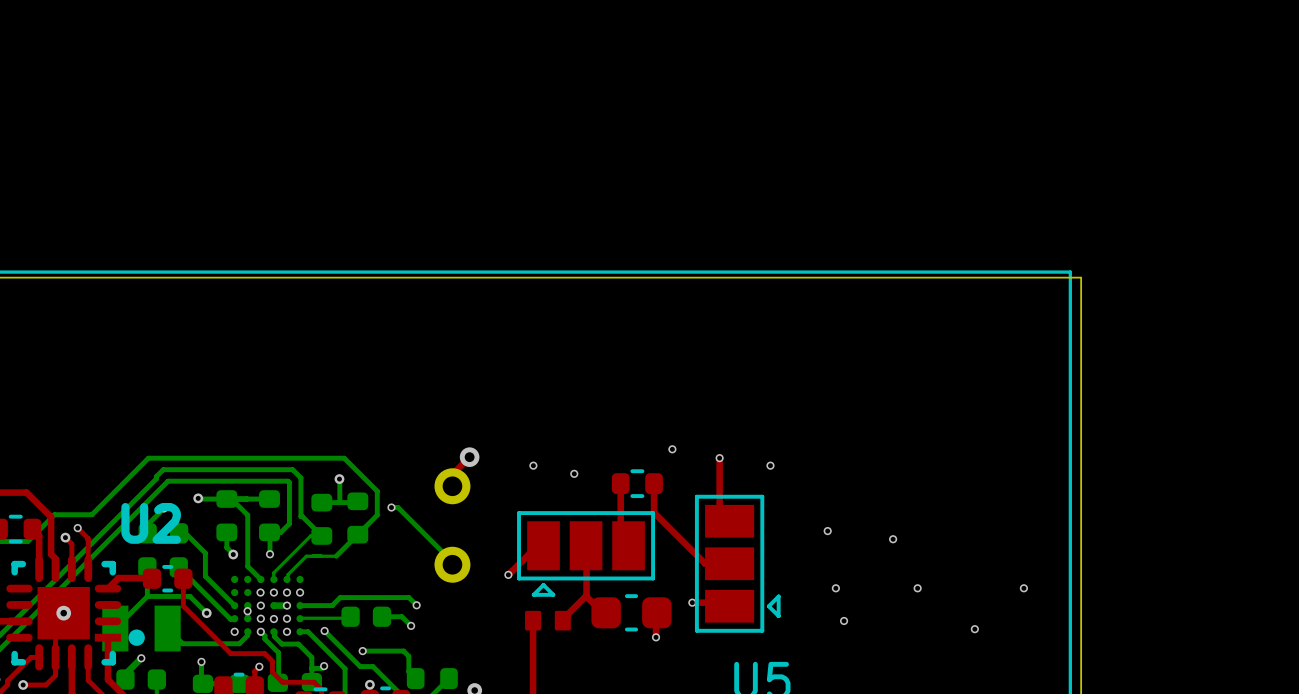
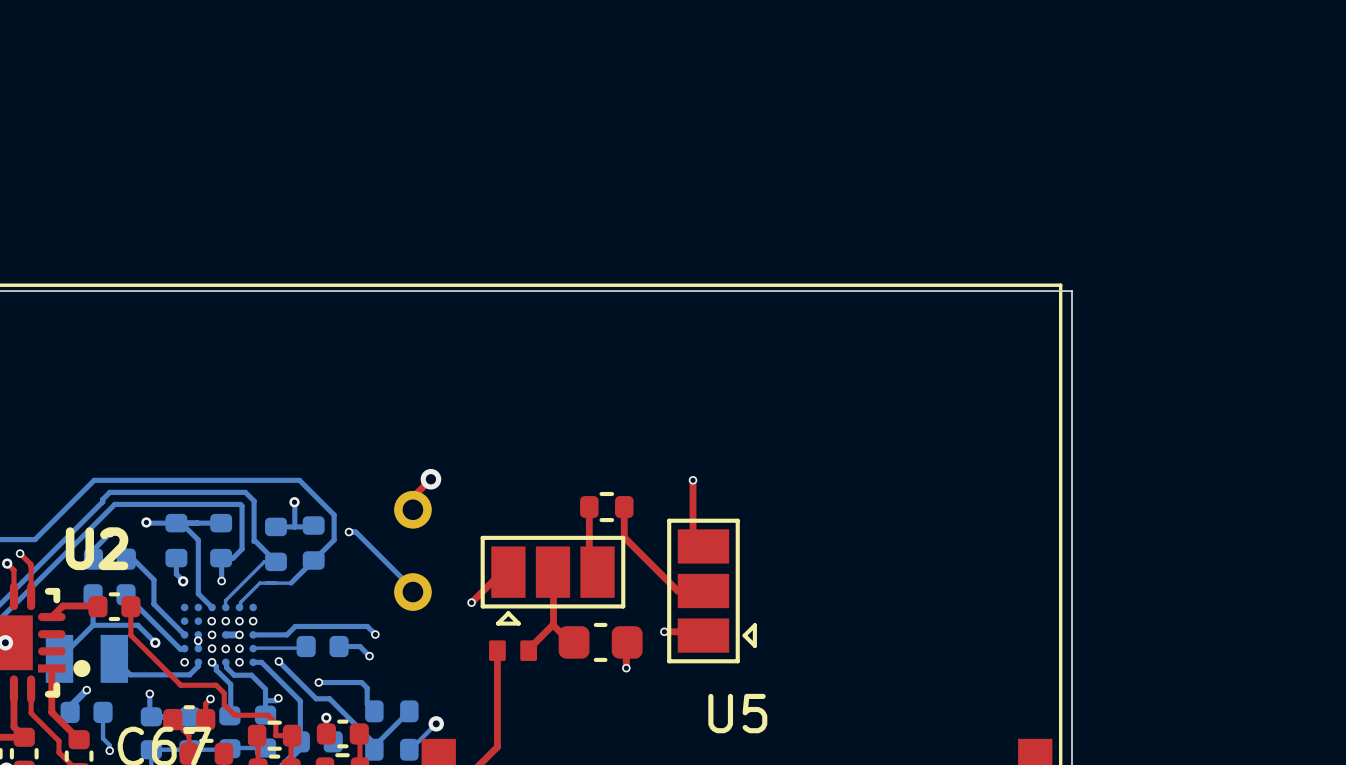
via: (672, 449) -> none
via: (533, 465) -> none
via: (770, 465) -> none
via: (574, 473) -> none
via: (827, 531) -> none
via: (893, 539) -> none
via: (835, 588) -> none
via: (917, 588) -> none
via: (1023, 588) -> none
via: (844, 620) -> none
via: (974, 629) -> none

